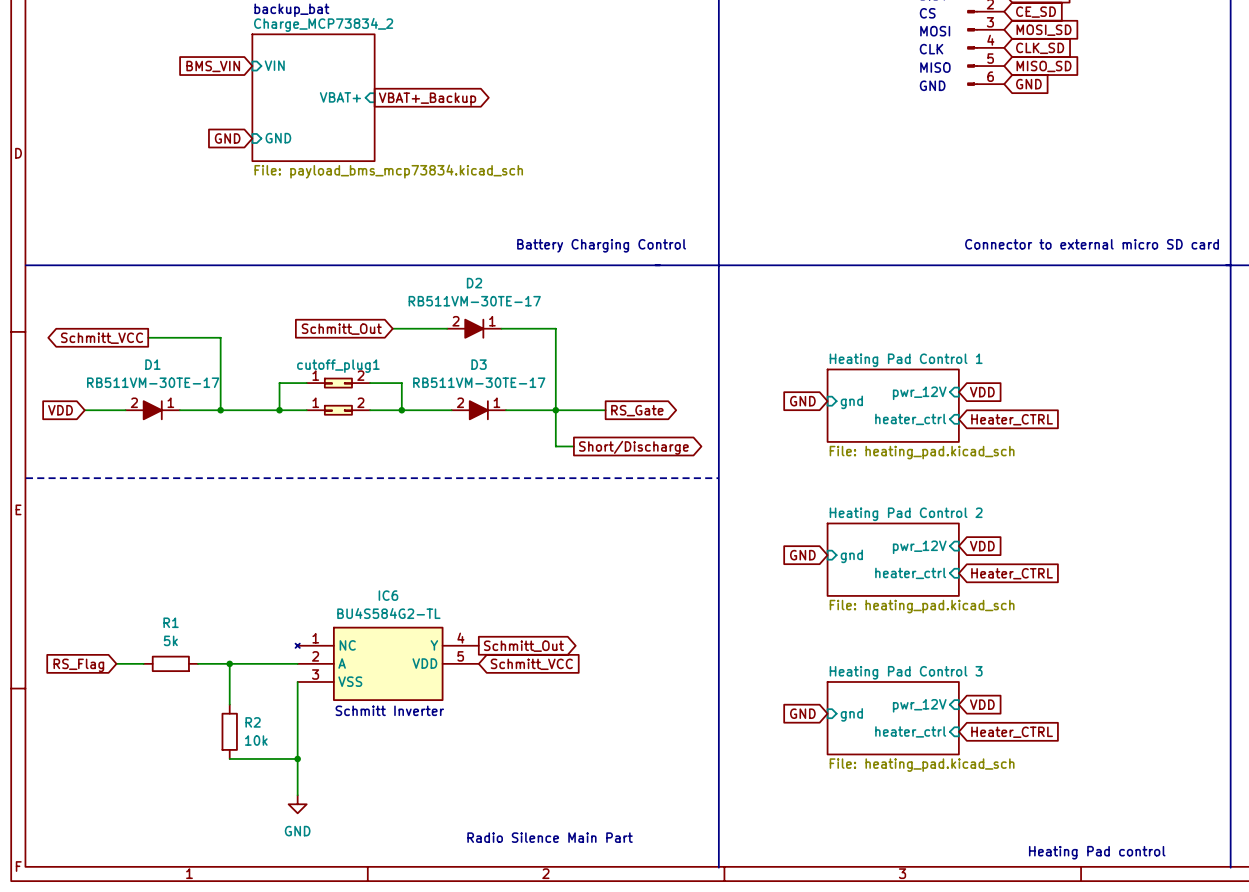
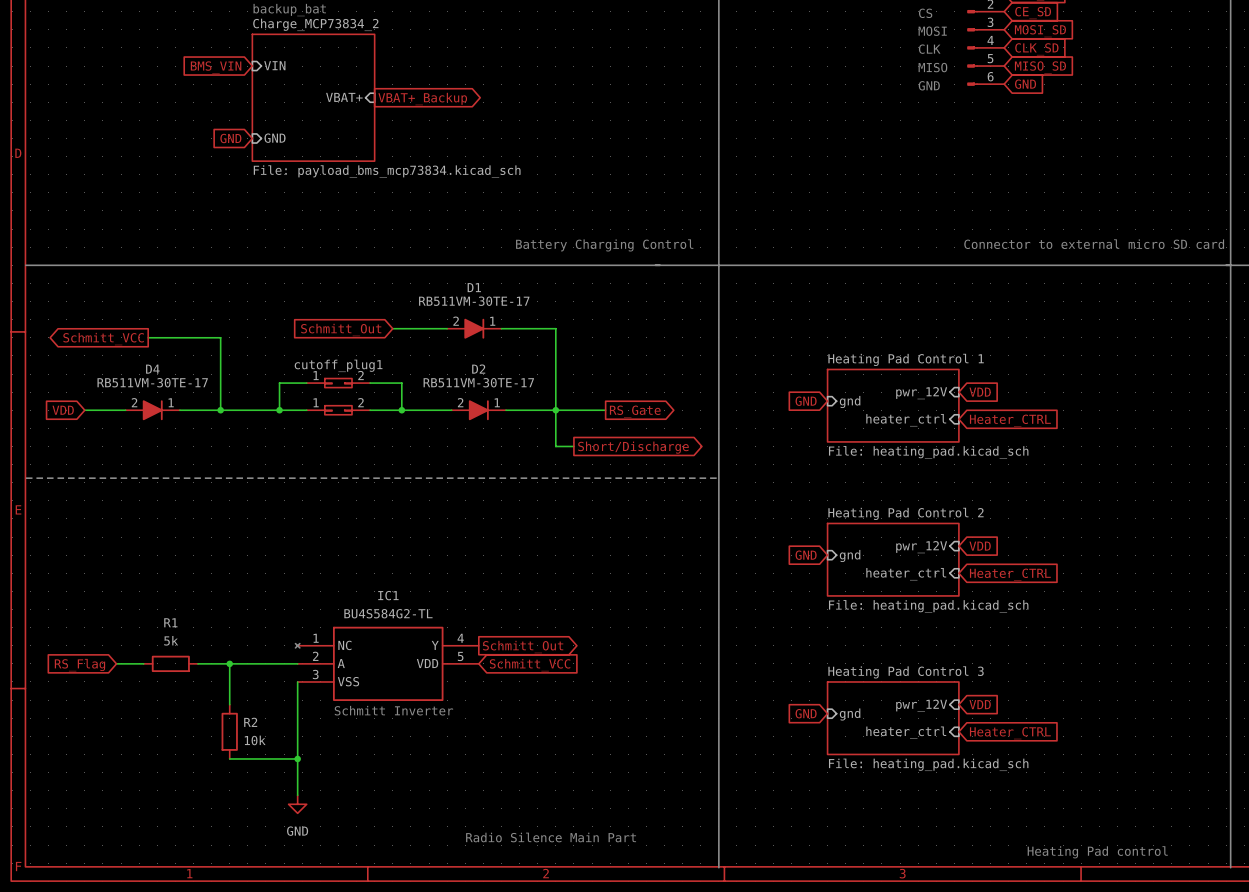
D2 name: D2 (474, 283) -> D1 (474, 287)
D1 name: D1 (152, 364) -> D4 (152, 369)
D3 name: D3 (479, 364) -> D2 (478, 369)
IC6 name: IC6 (388, 595) -> IC1 (388, 595)

